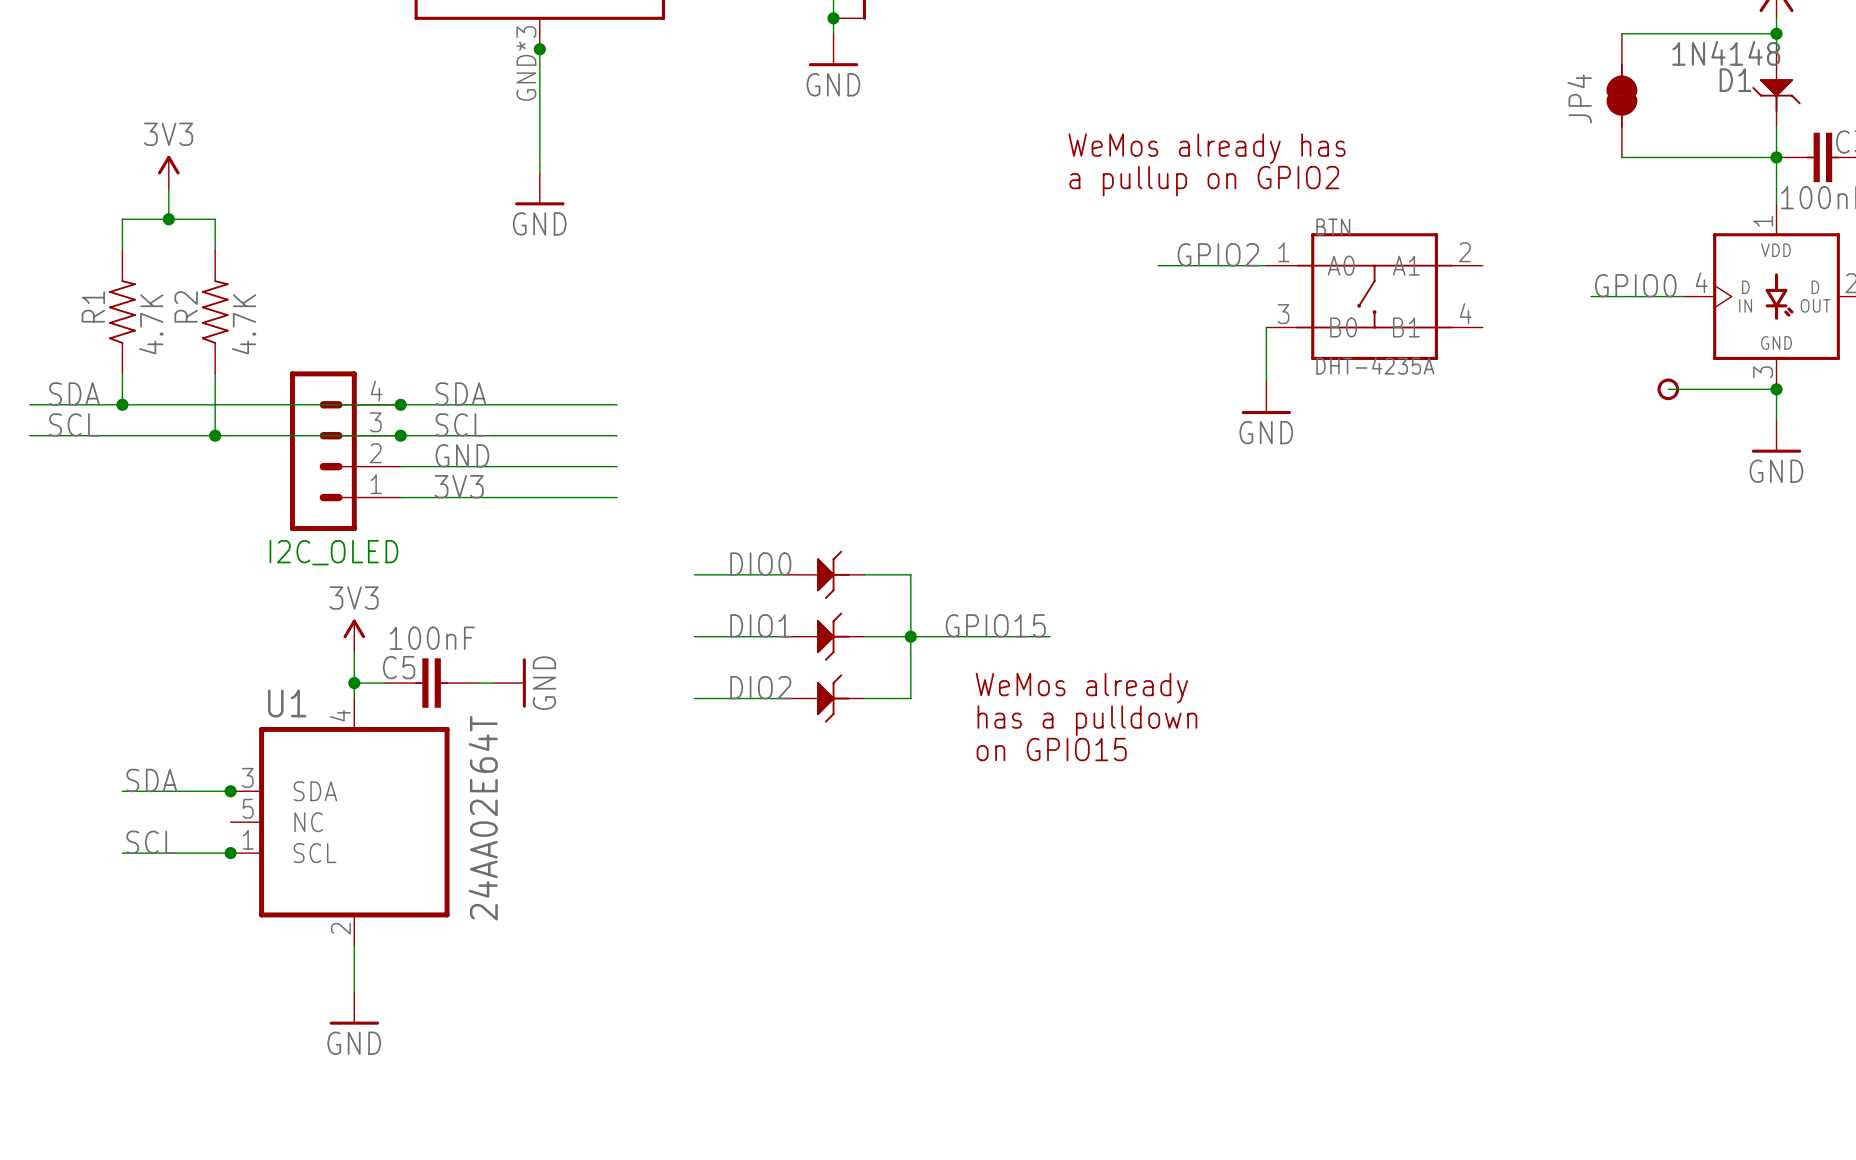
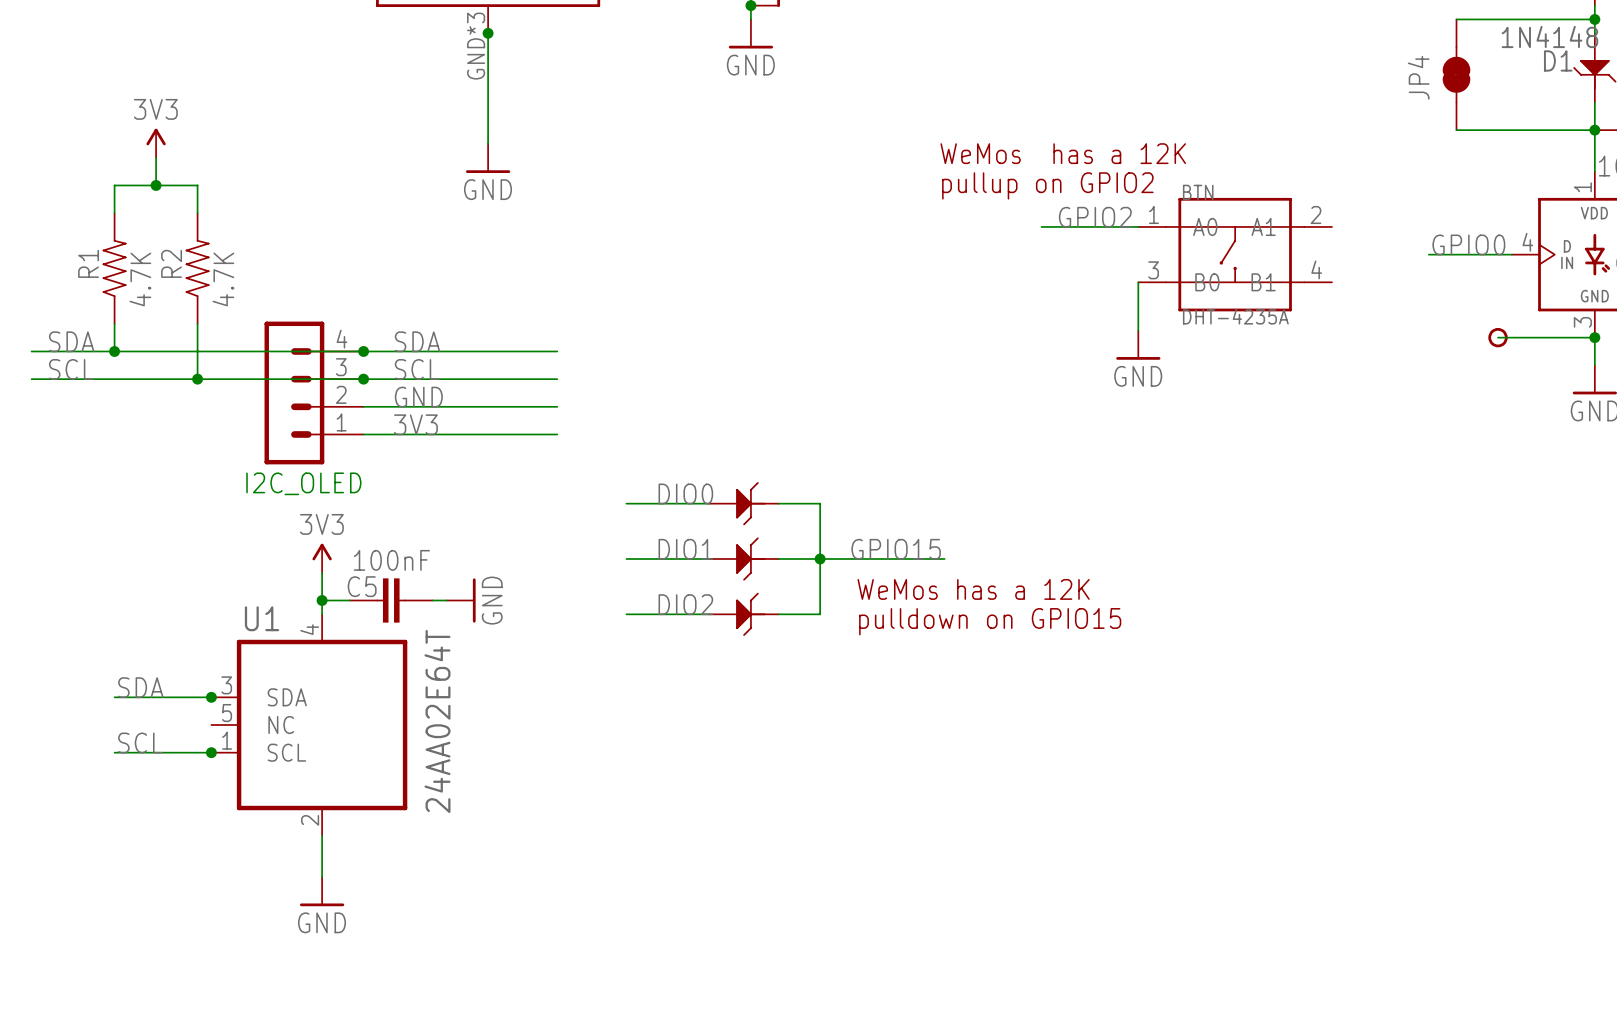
text: WeMos already has (1207, 148) -> WeMos has a 12K (1063, 153)
text: a pullup on GPIO2 (1204, 181) -> pullup on GPIO2 (1047, 185)
text: none -> WeMos has a 12K (973, 589)
text: WeMos already (1081, 688) -> none
text: none -> pulldown on GPIO15 (990, 621)
text: has a pulldown (1087, 720) -> none
text: on GPIO15 (1051, 749) -> none

